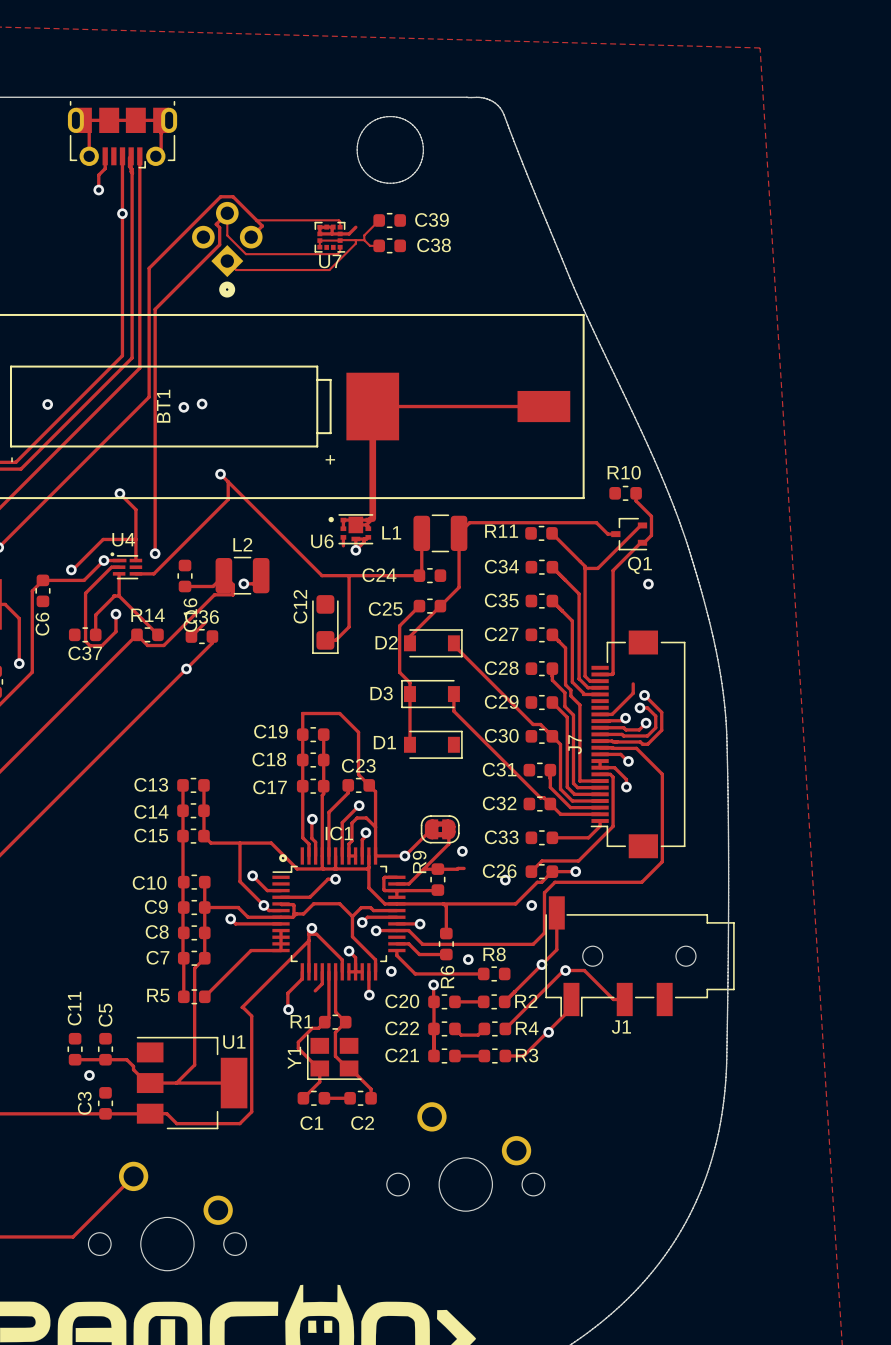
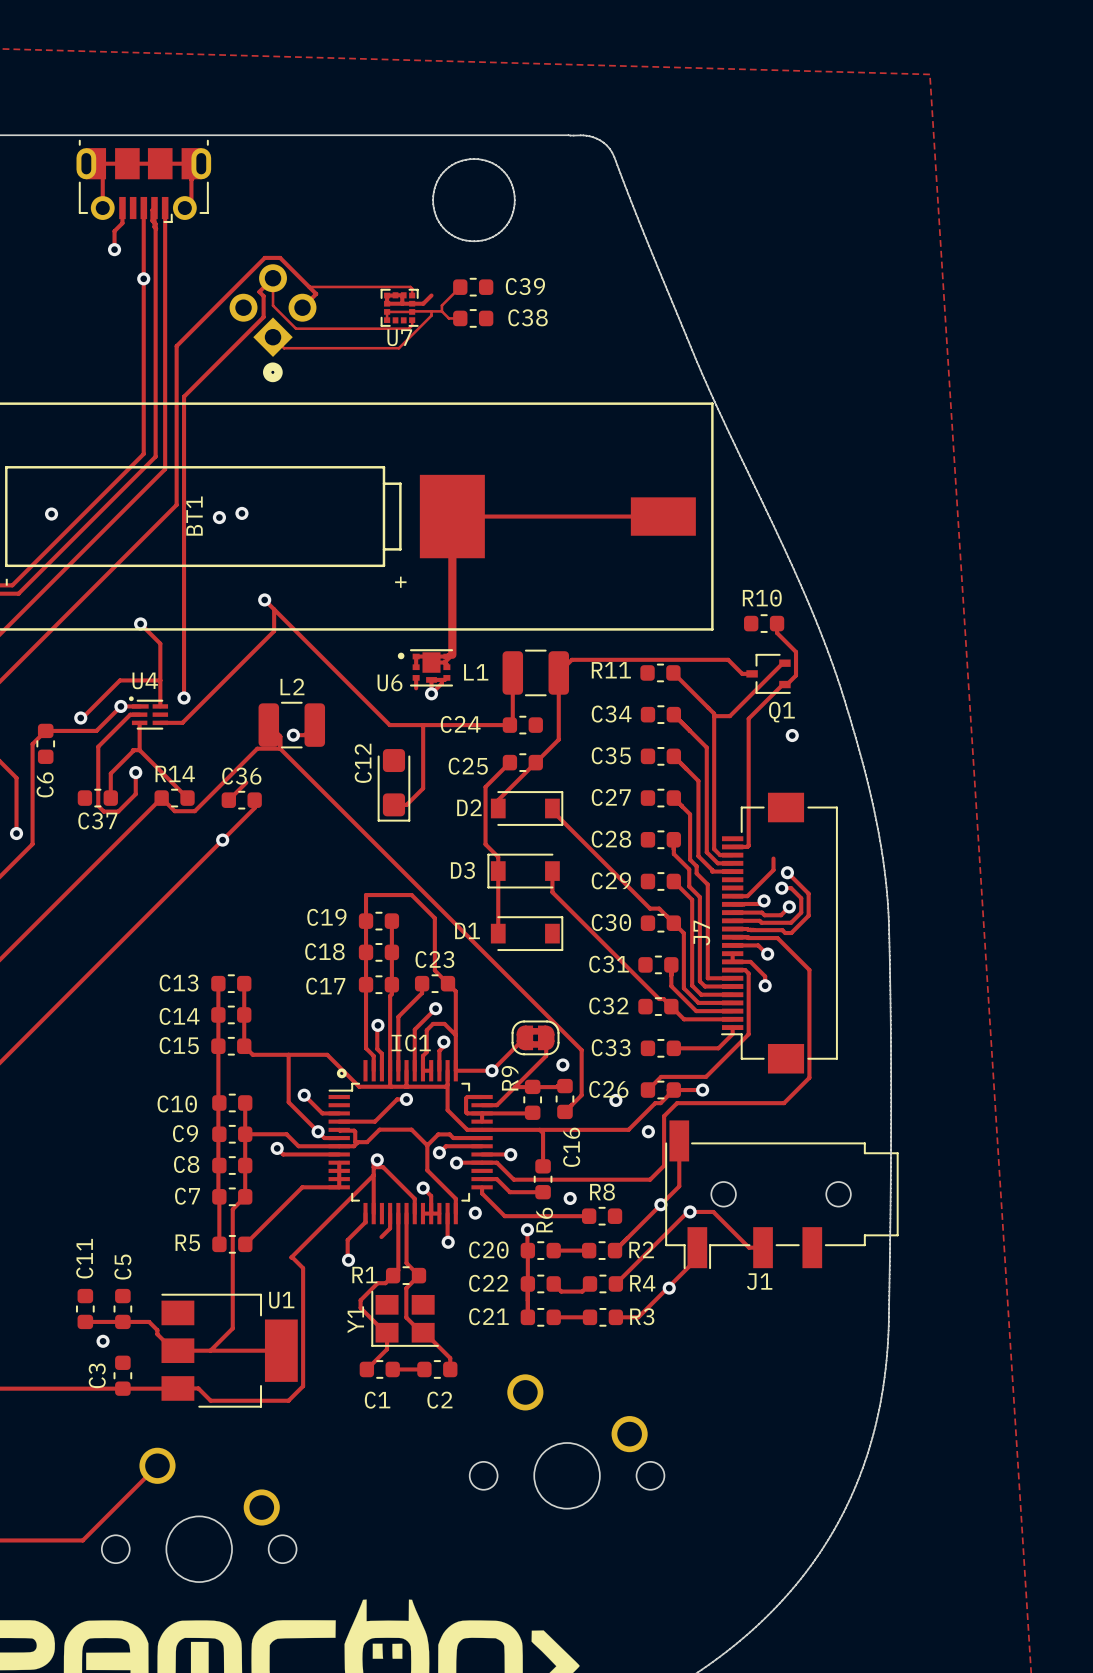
track: (223, 575) (213, 586) (185, 586) -> none
C16 position: (185, 576) -> (564, 1098)
track: none -> (280, 748) (581, 1050) (581, 1095) (564, 1111)

